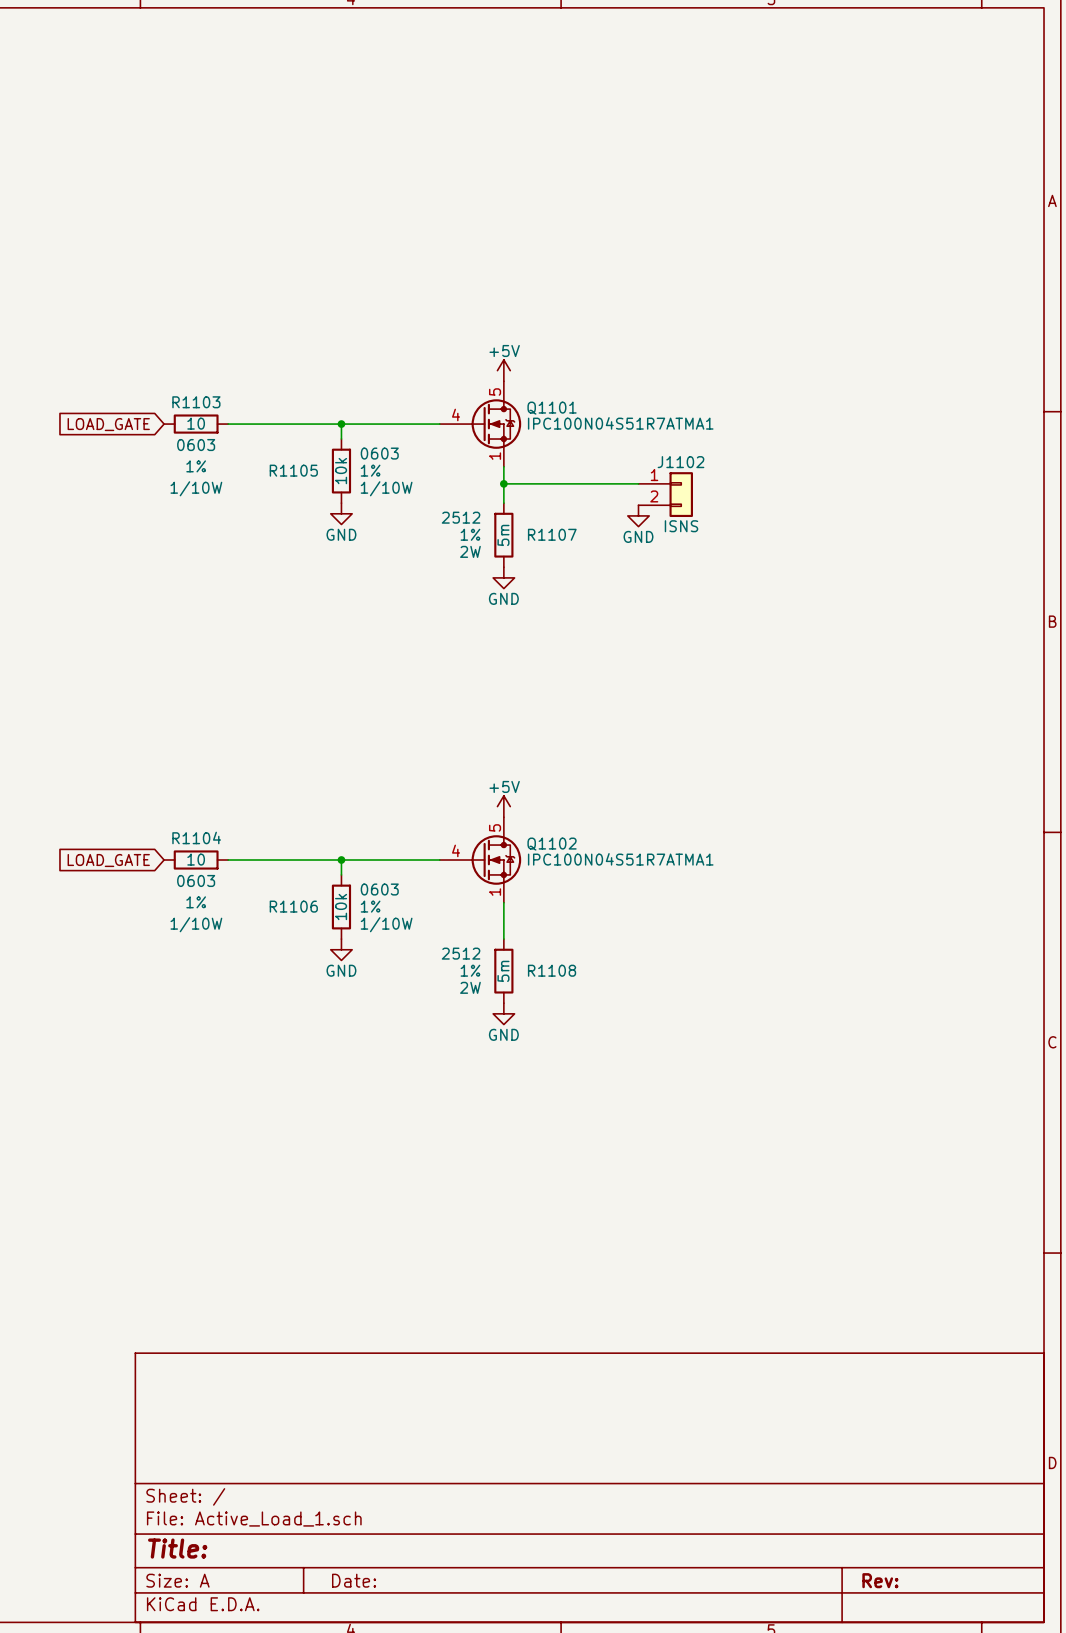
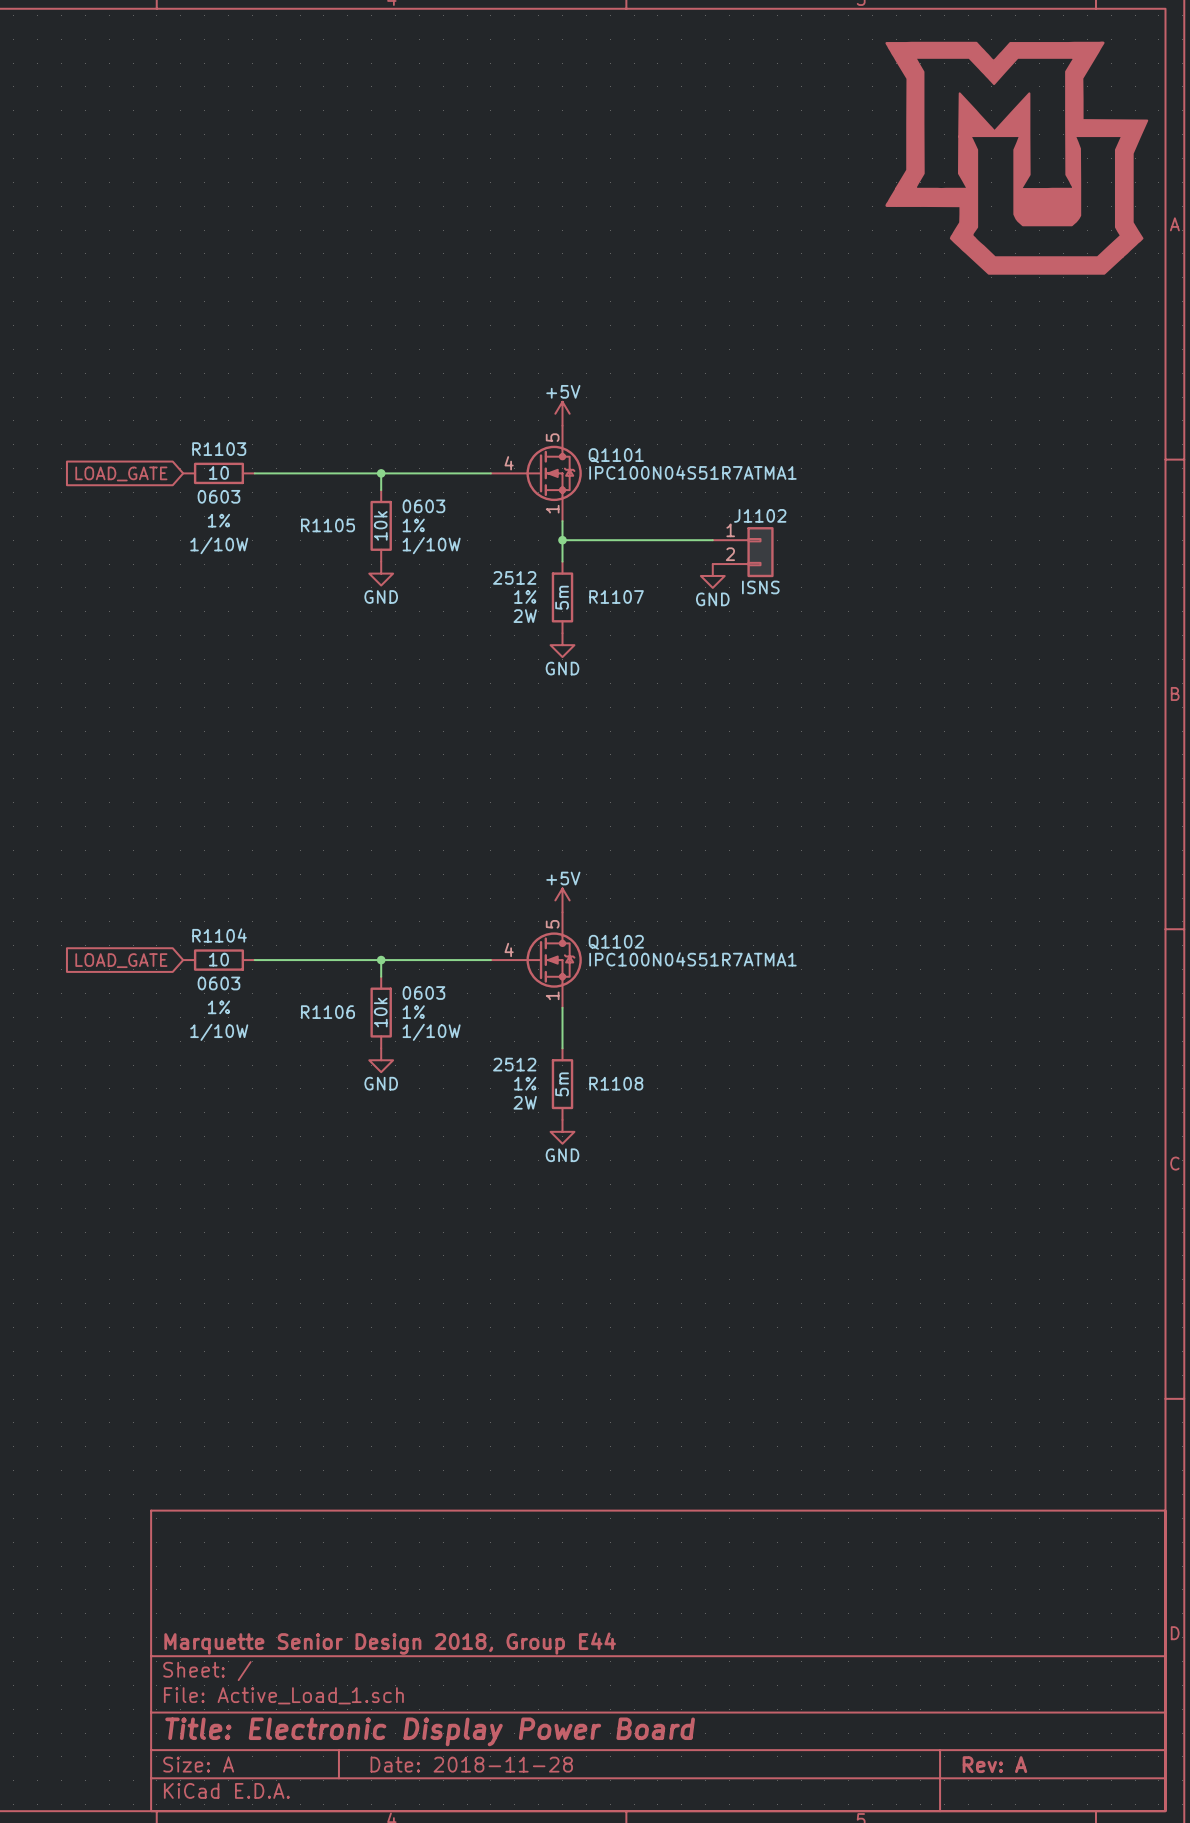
power symbol: none -> (1016, 158)
title block: none -> Marquette Senior Design 2018, Group E44 (390, 1643)
title block: Title: (177, 1548) -> Title: Electronic Display Power Board (430, 1731)
title block: Date: (354, 1580) -> Date: 2018-11-28 (471, 1764)
title block: Rev: (880, 1580) -> Rev: A (994, 1764)

